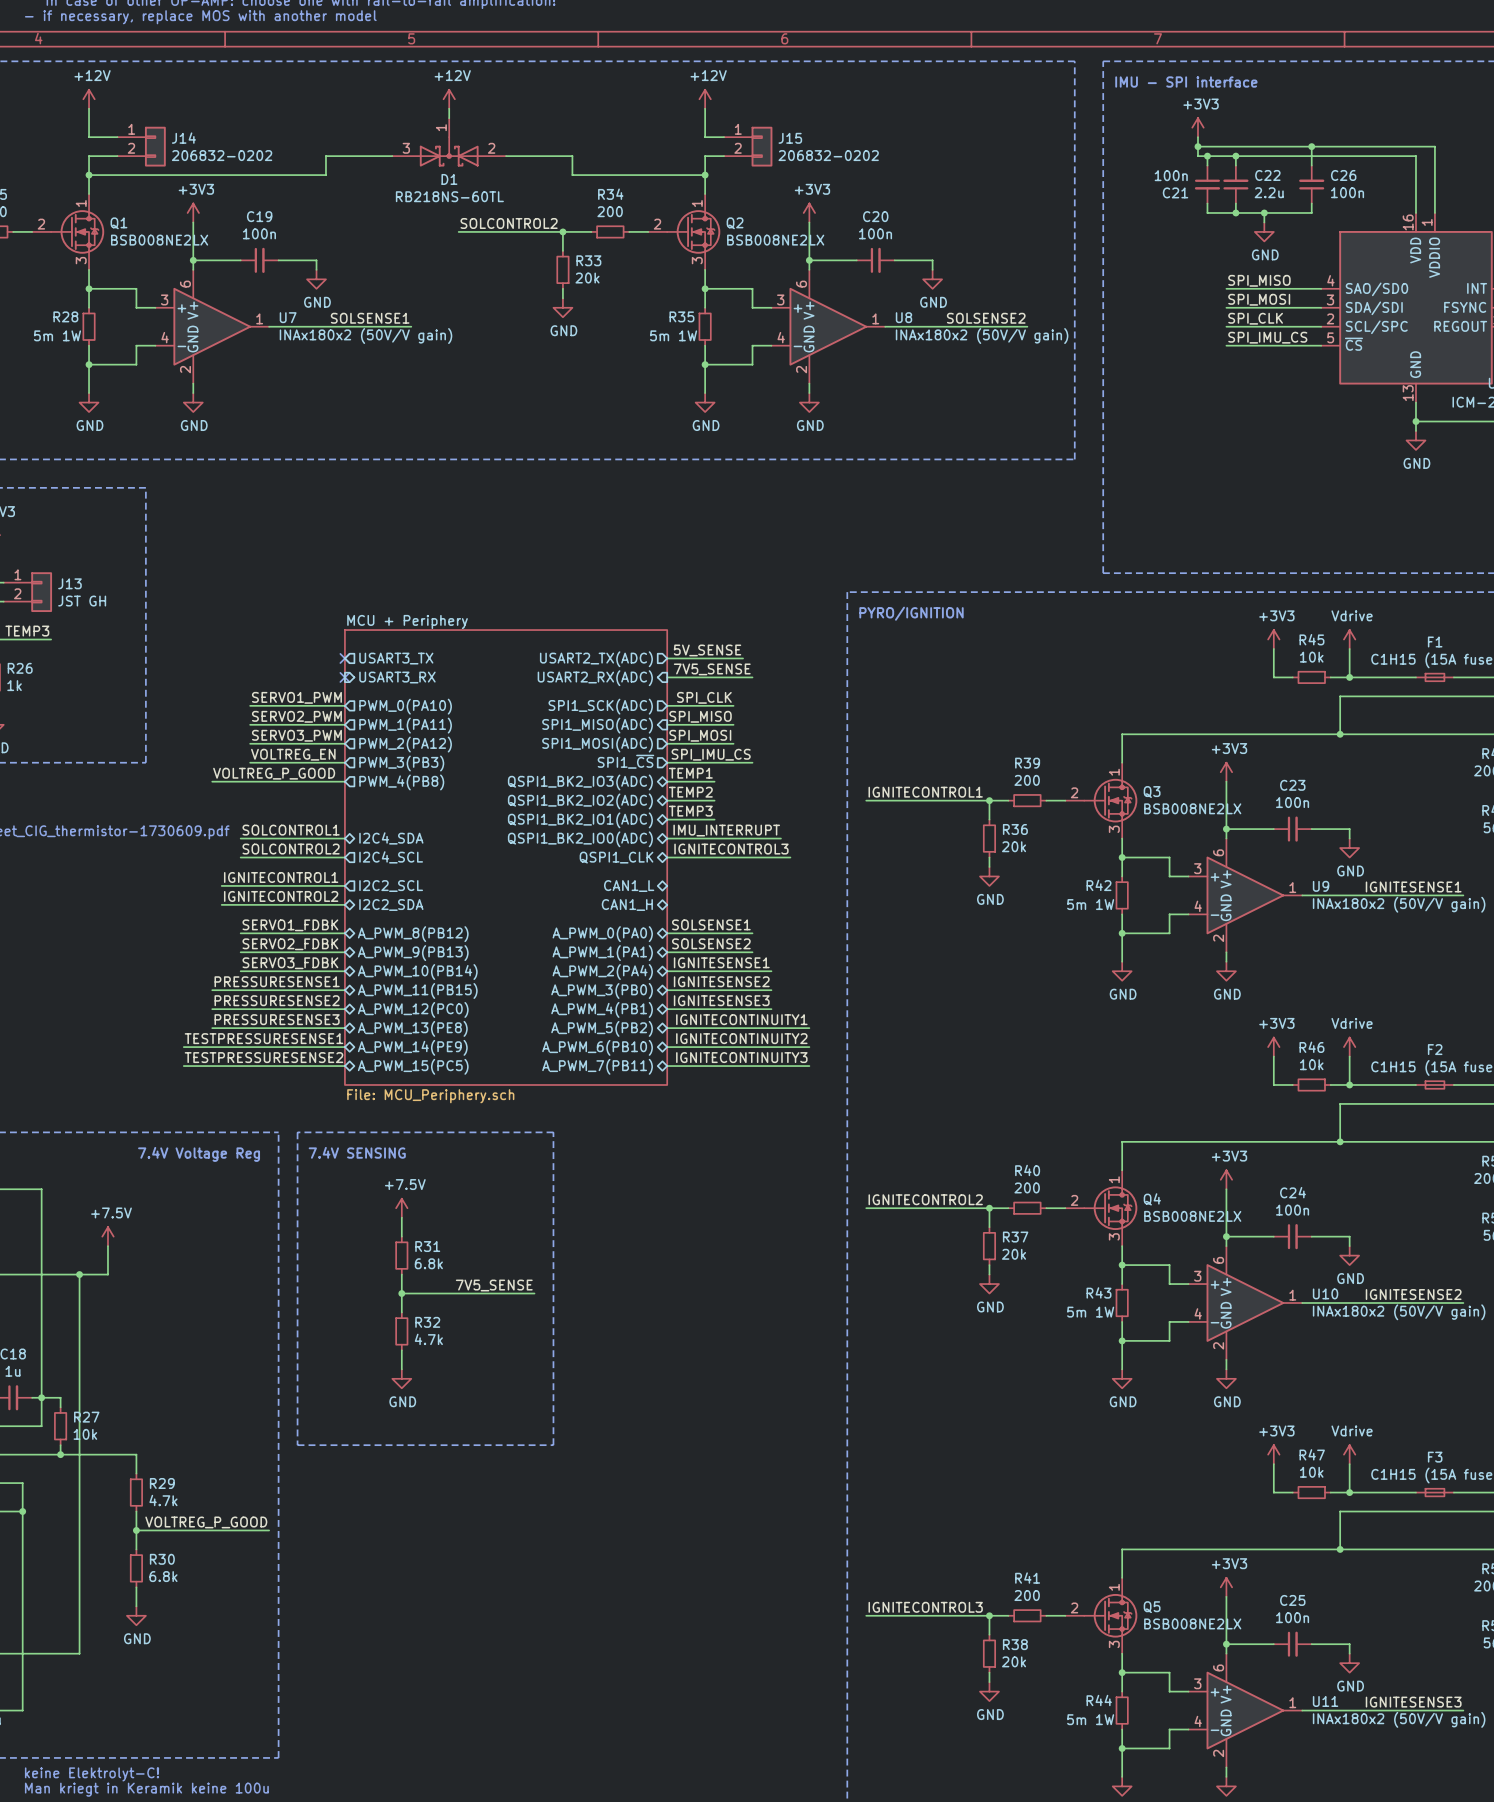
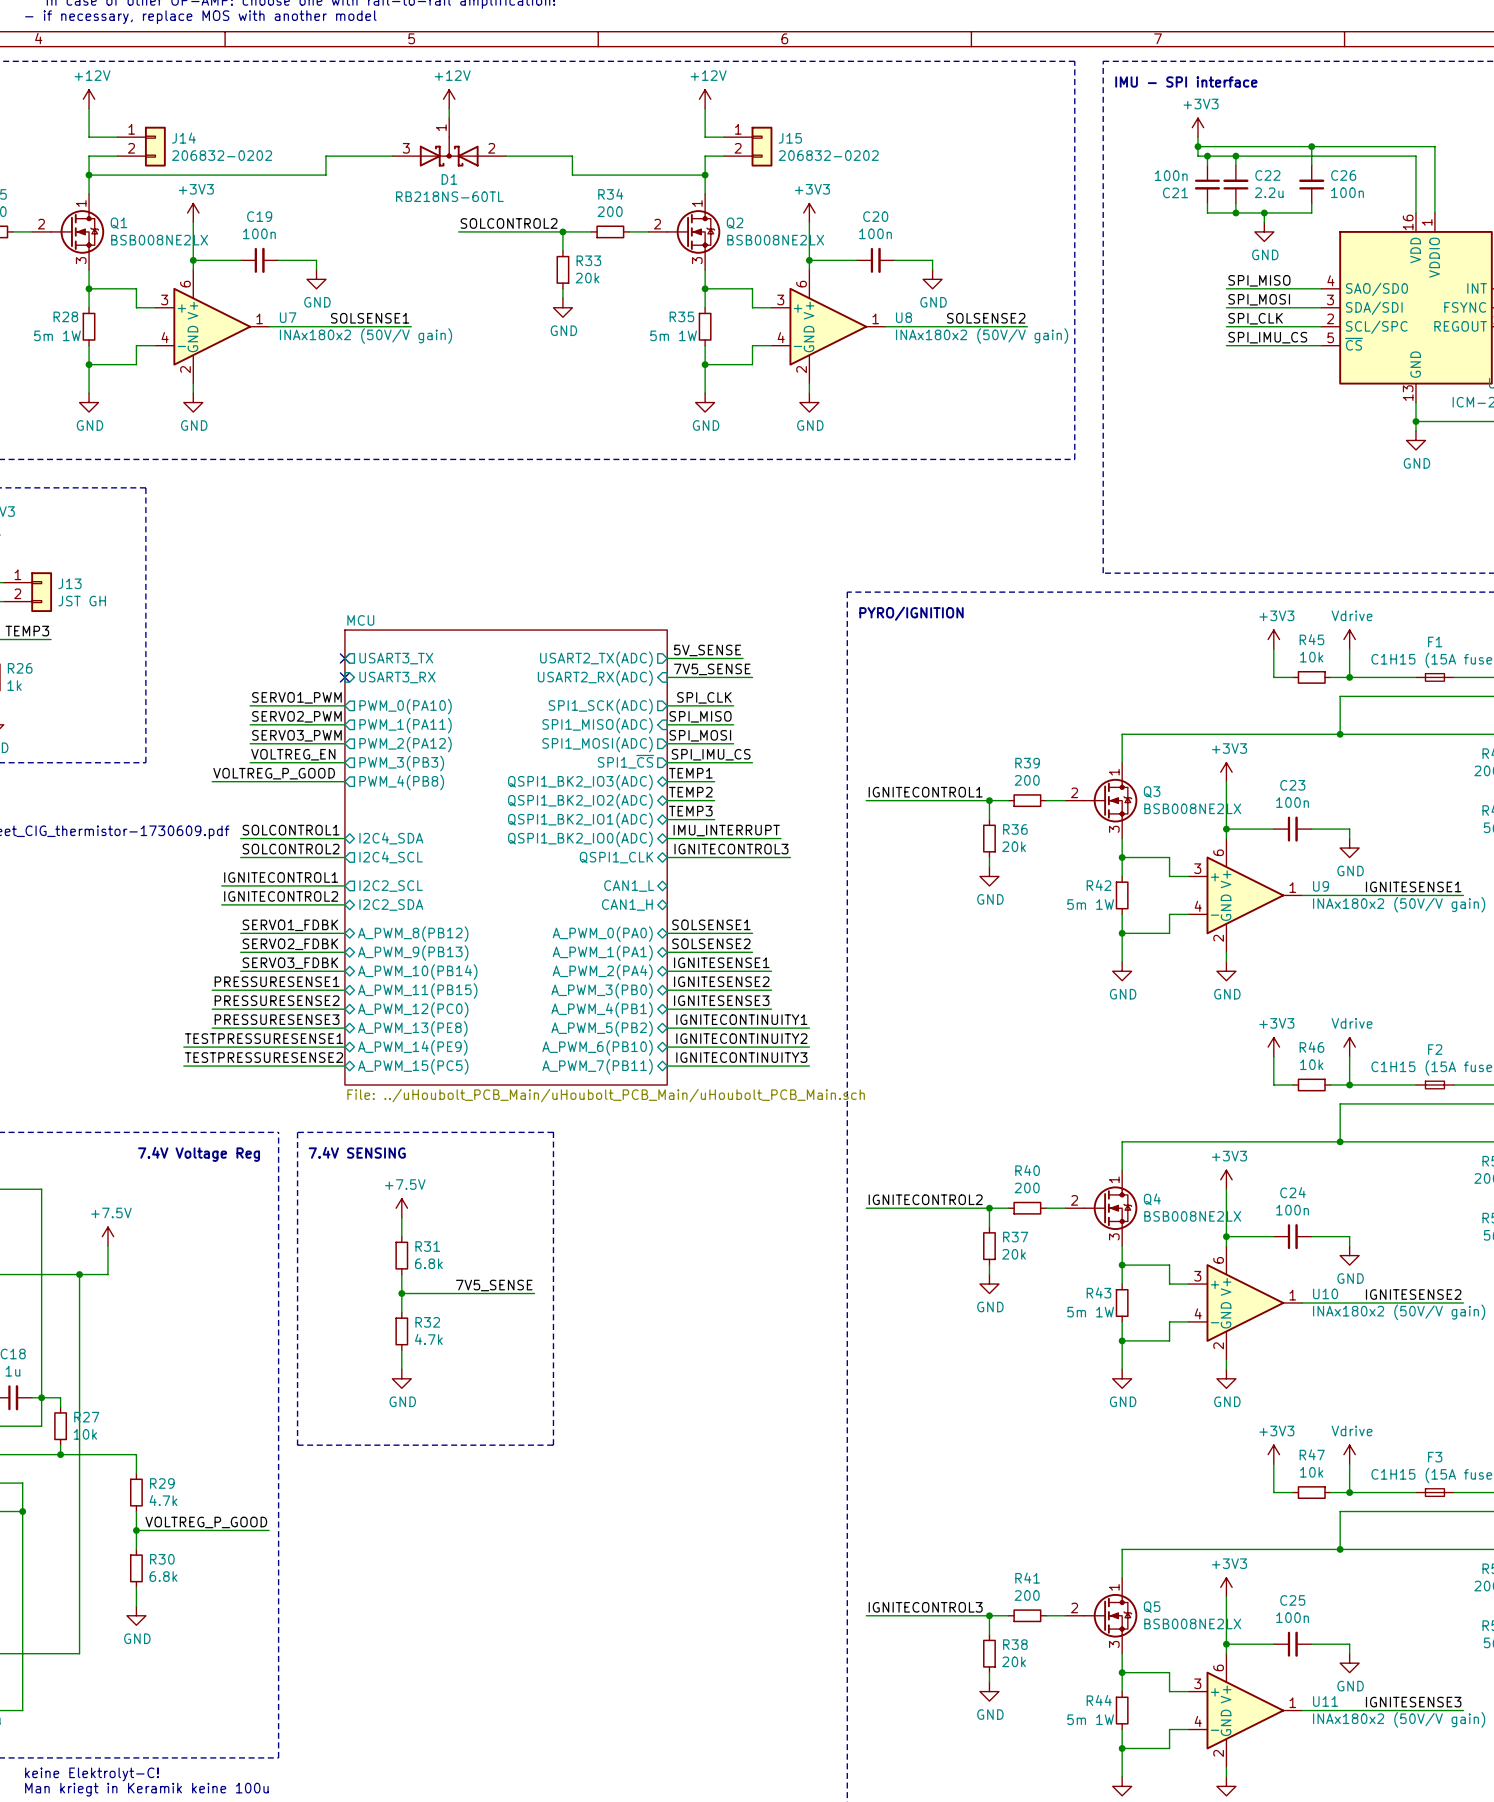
sheet MCU + Periphery name: MCU + Periphery (407, 621) -> MCU (360, 620)
sheet MCU + Periphery value: File: MCU_Periphery.sch (430, 1096) -> File: ../uHoubolt_PCB_Main/uHoubolt_PCB_Main/uHoubolt_PCB_Main.sch (606, 1095)

